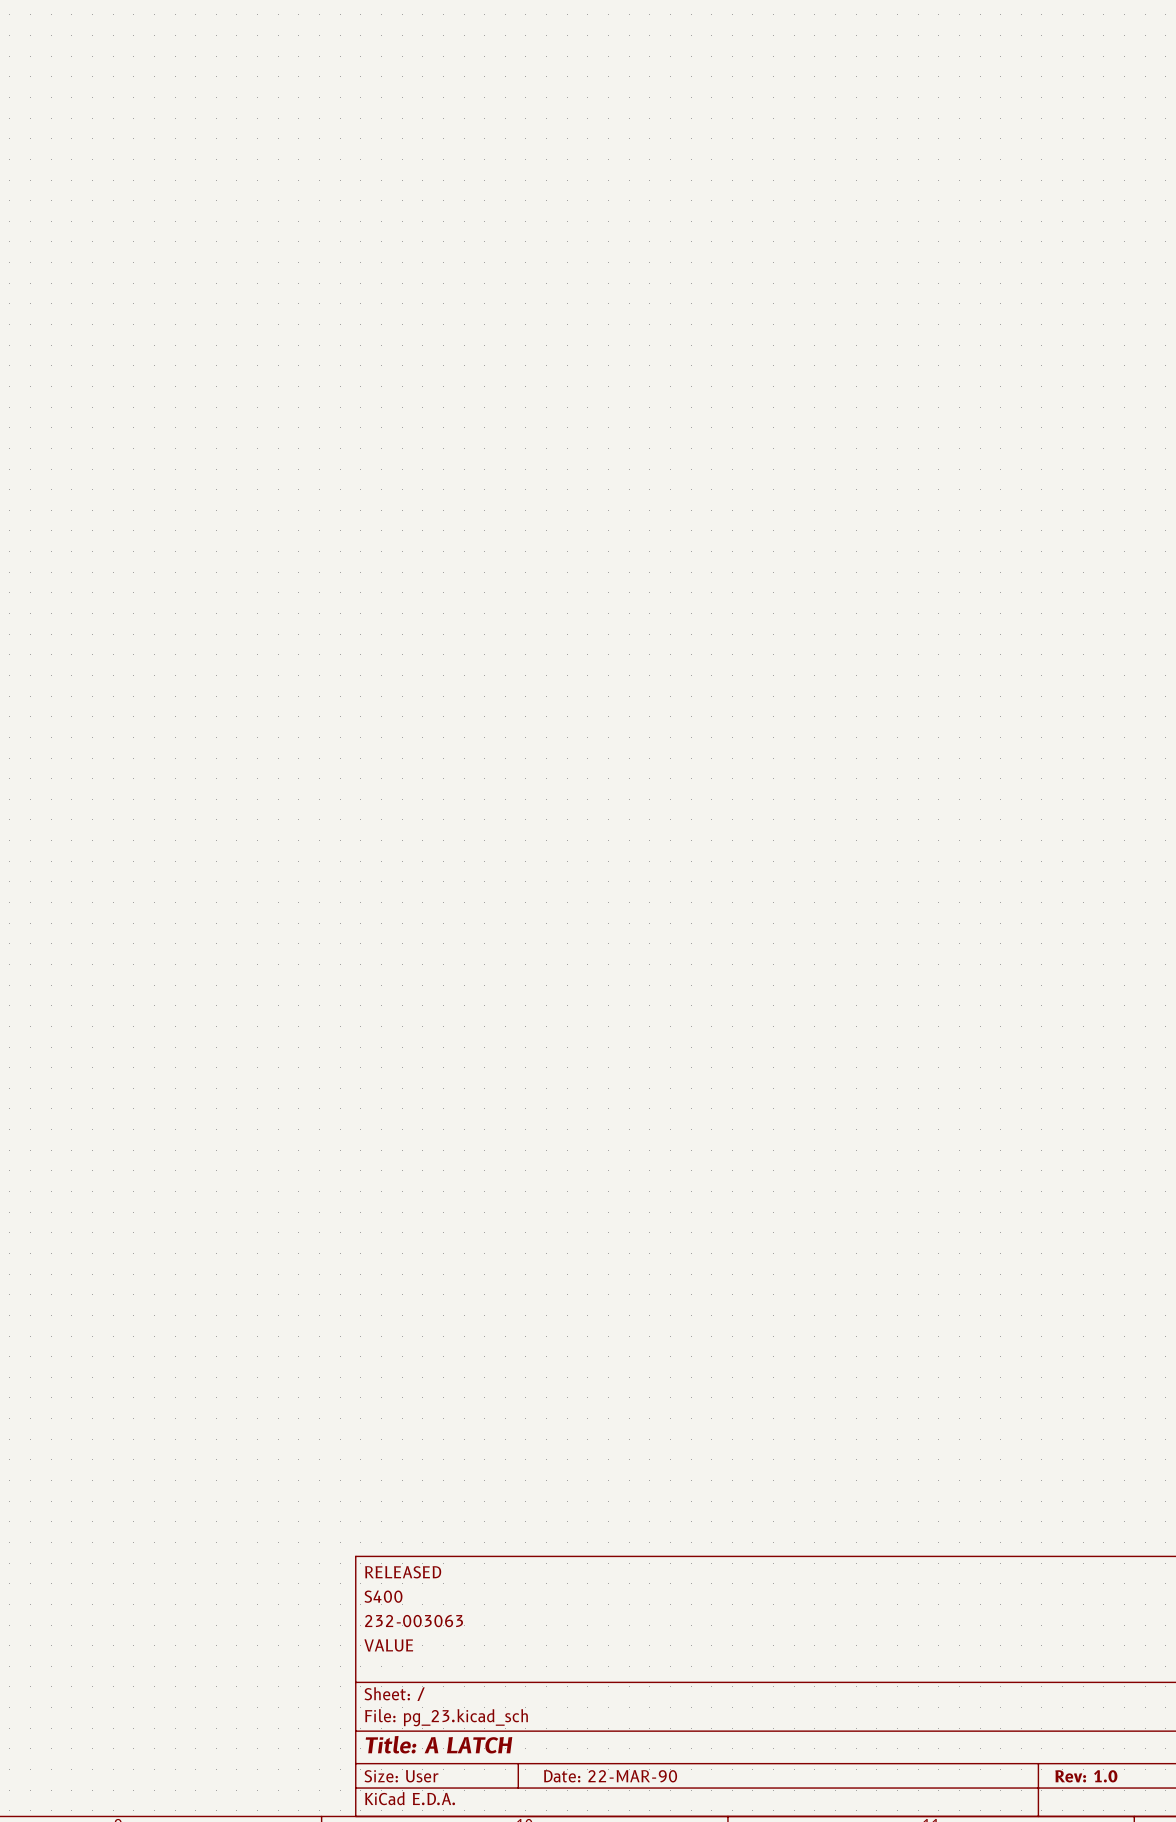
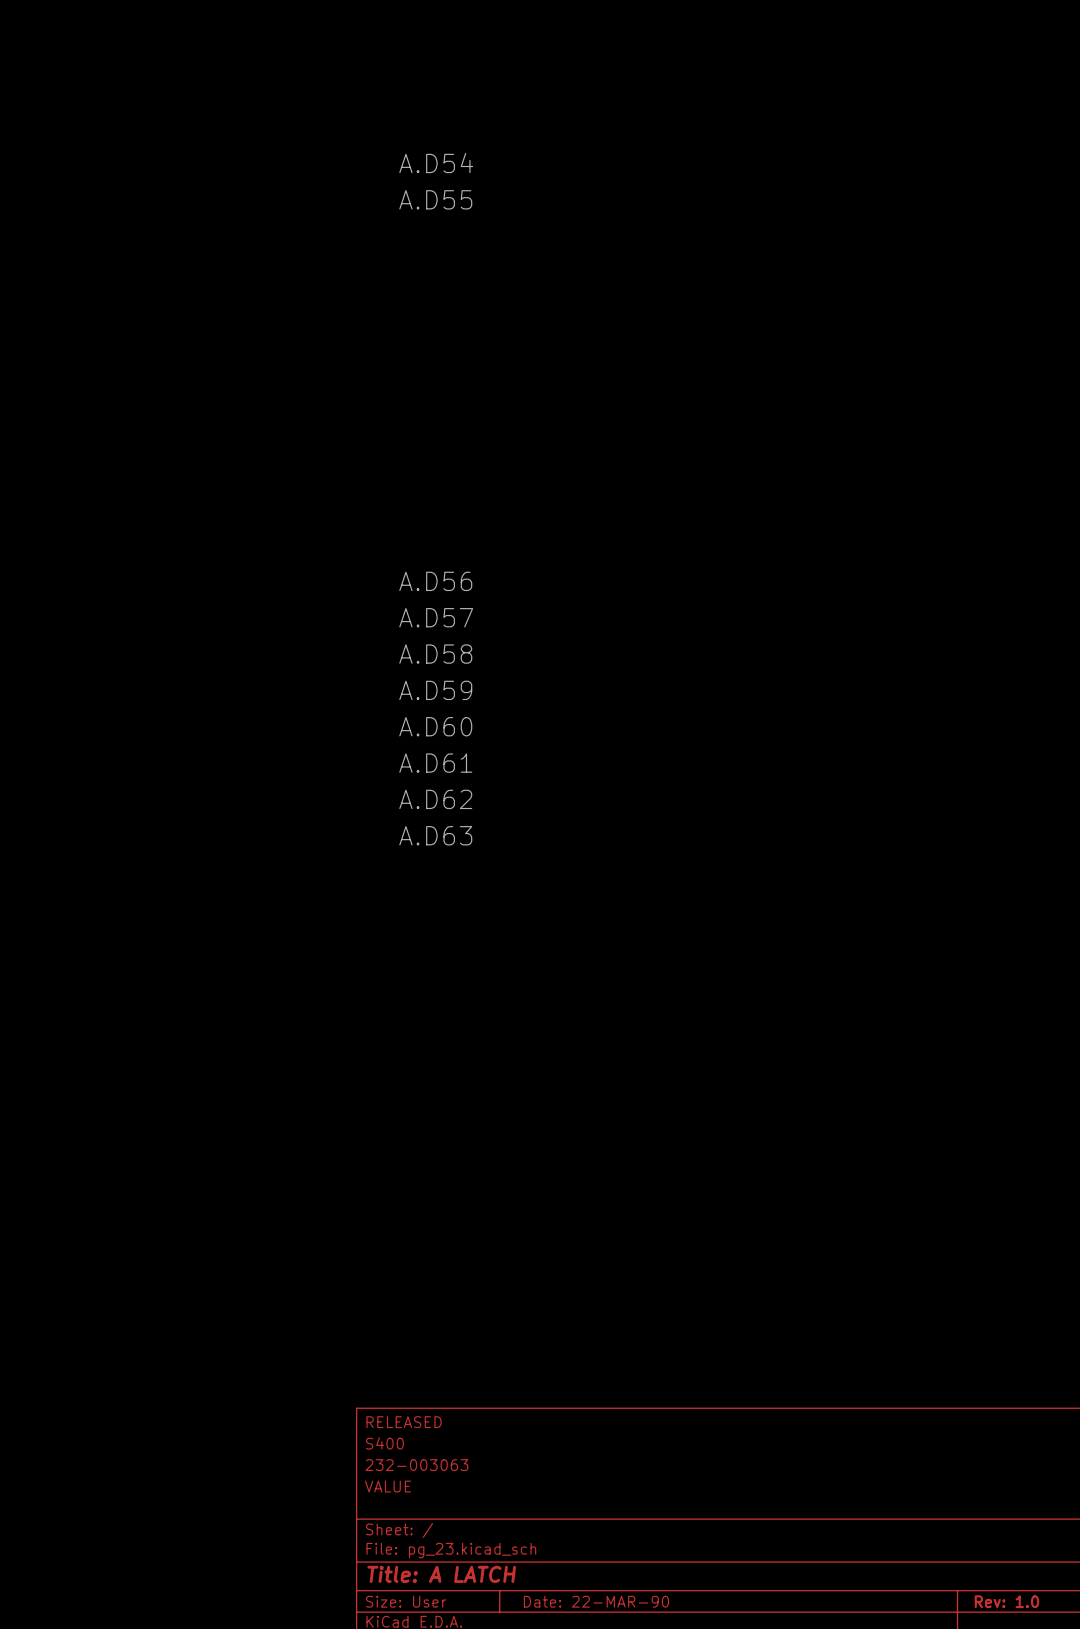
label: none -> A.D54 (436, 163)
label: none -> A.D55 (435, 199)
label: none -> A.D56 (435, 581)
label: none -> A.D57 (436, 617)
label: none -> A.D58 (435, 654)
label: none -> A.D59 (435, 690)
label: none -> A.D60 (435, 726)
label: none -> A.D61 (435, 763)
label: none -> A.D62 (435, 799)
label: none -> A.D63 (435, 835)

